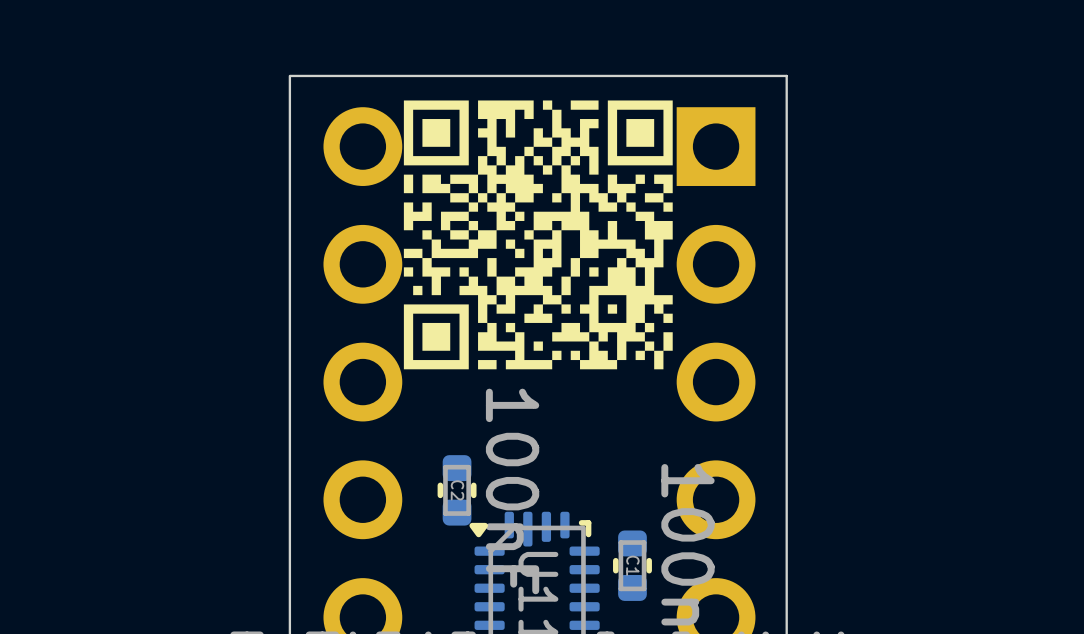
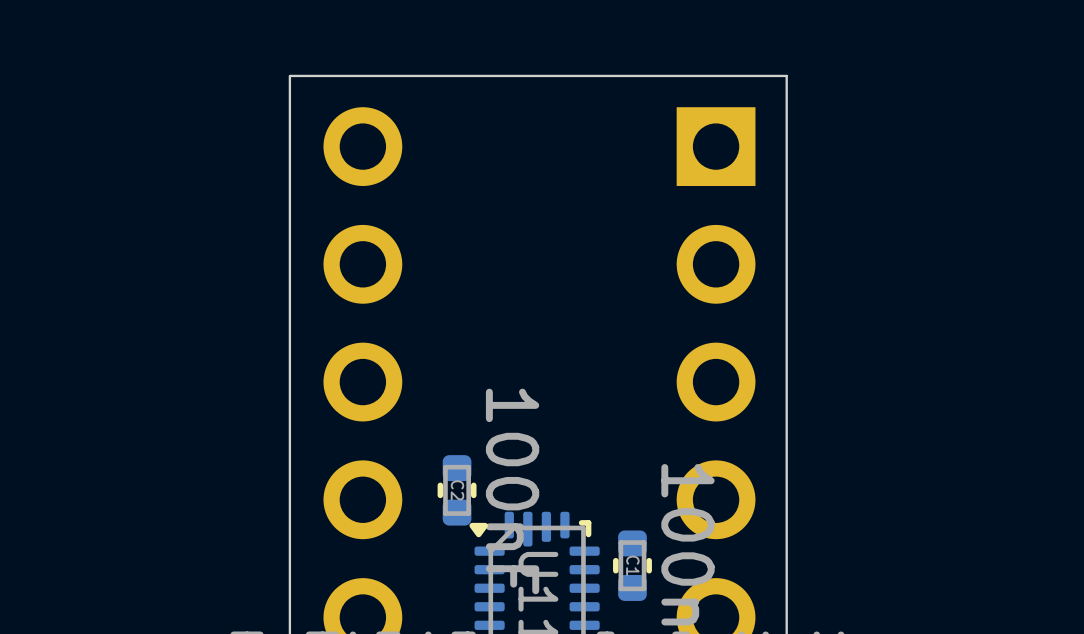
drawing: [403, 100, 673, 370] -> none

